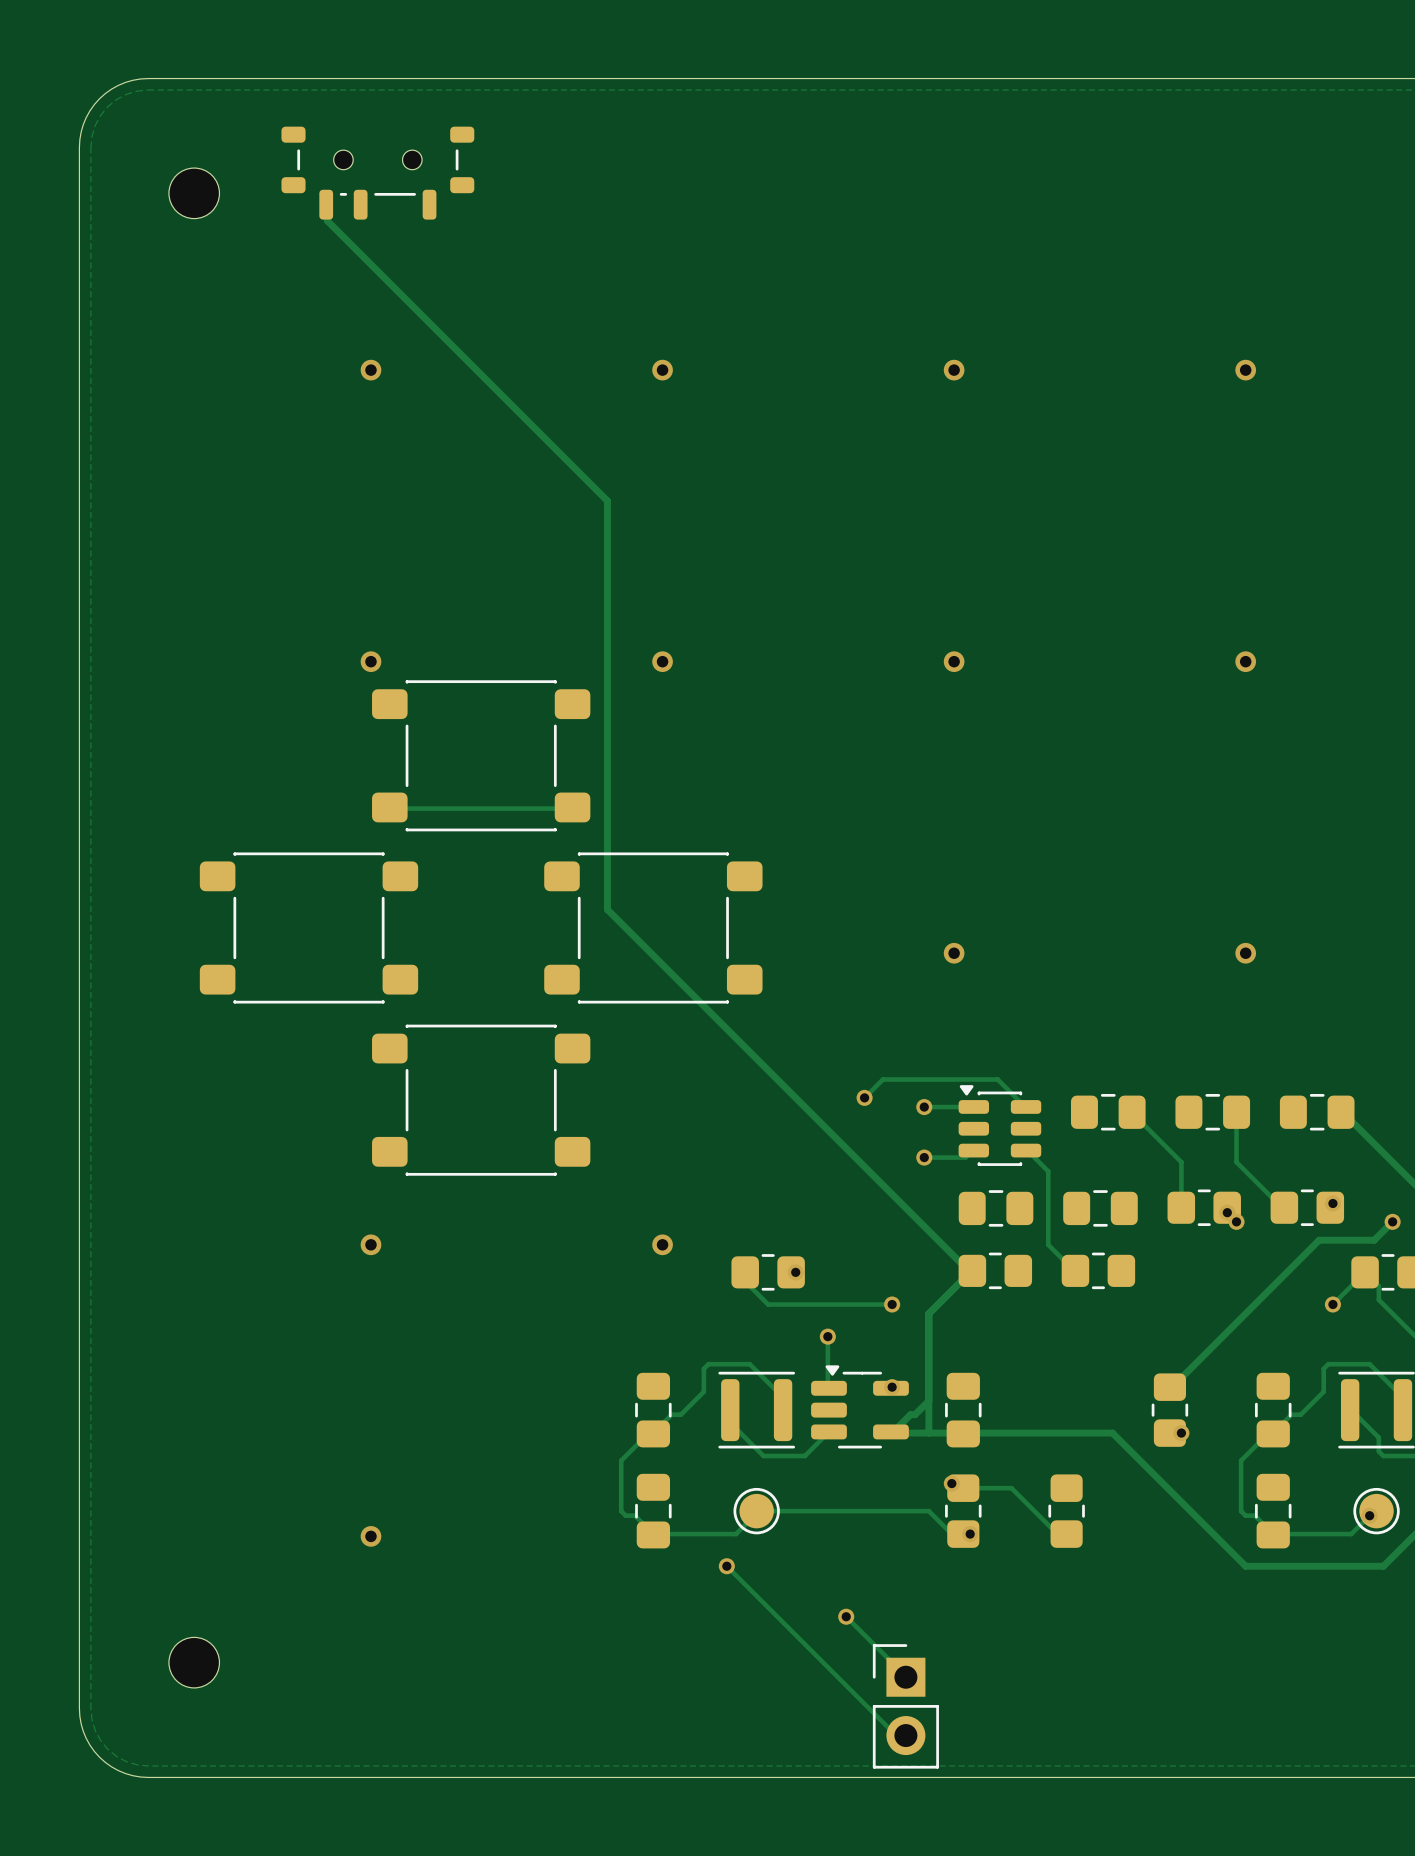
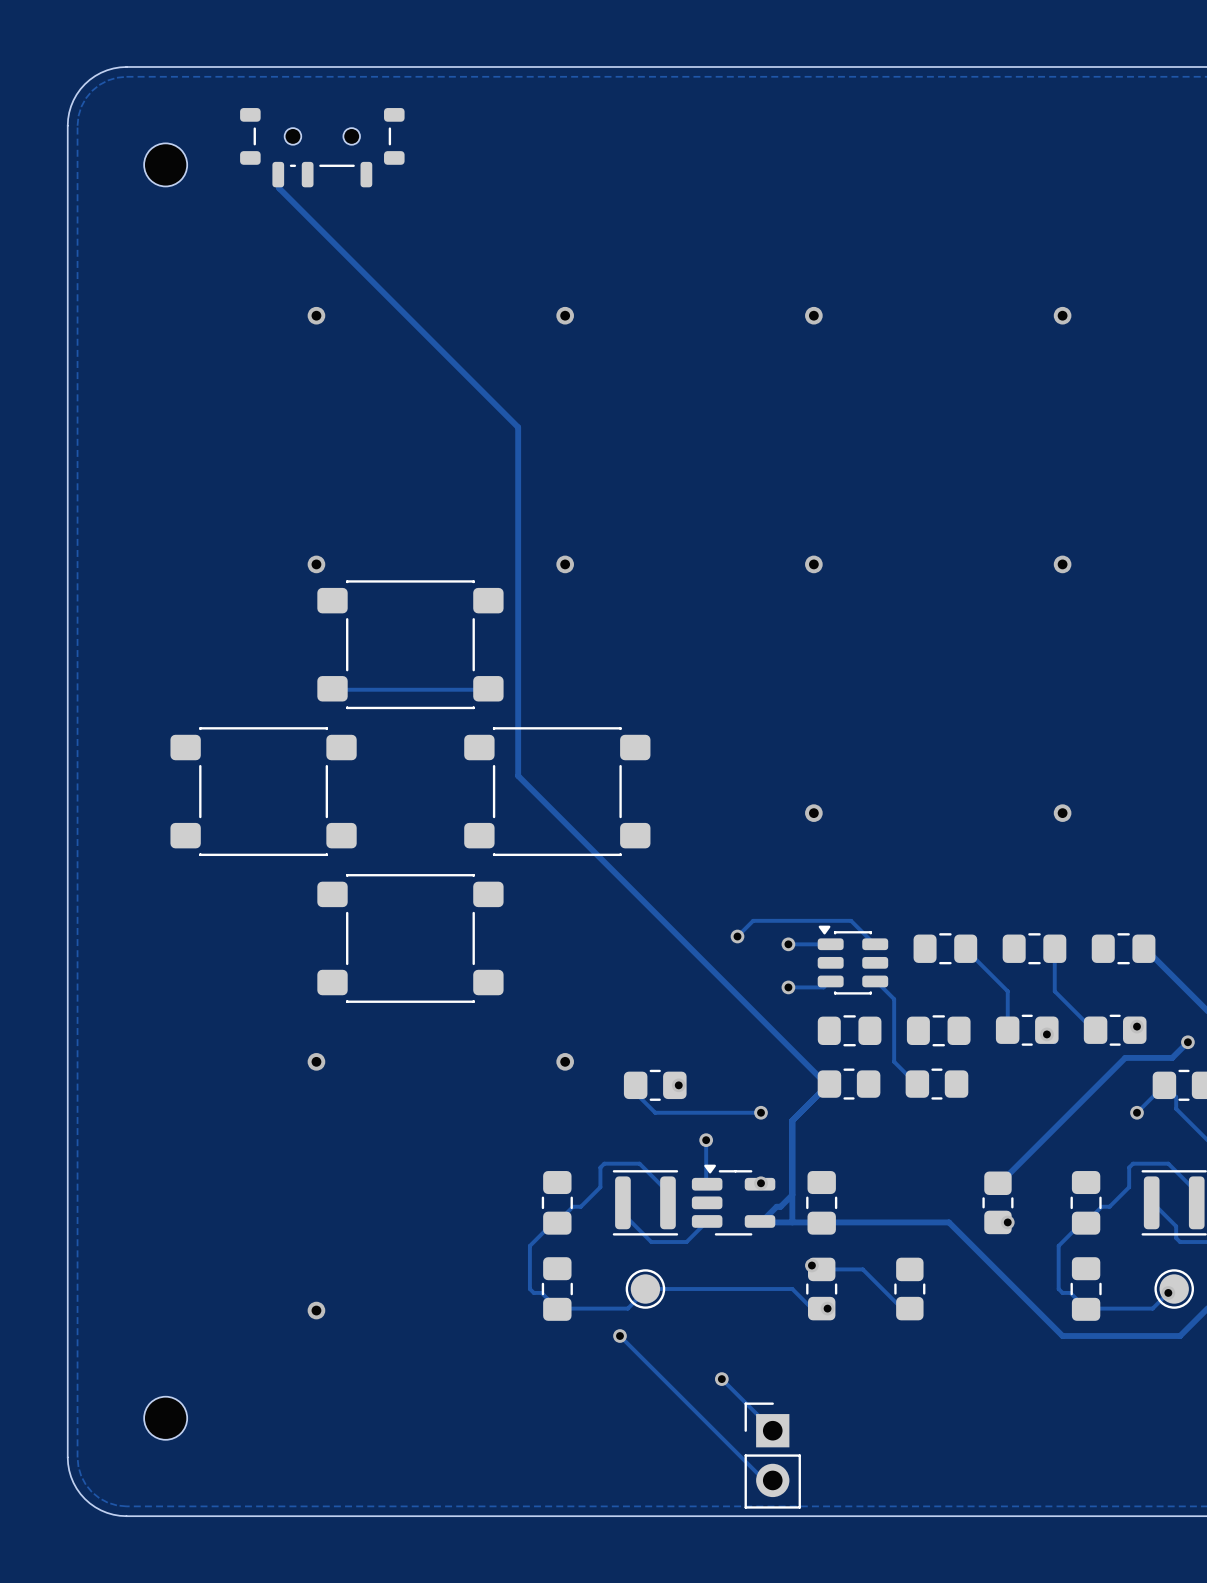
via: (1236, 1221) -> none

